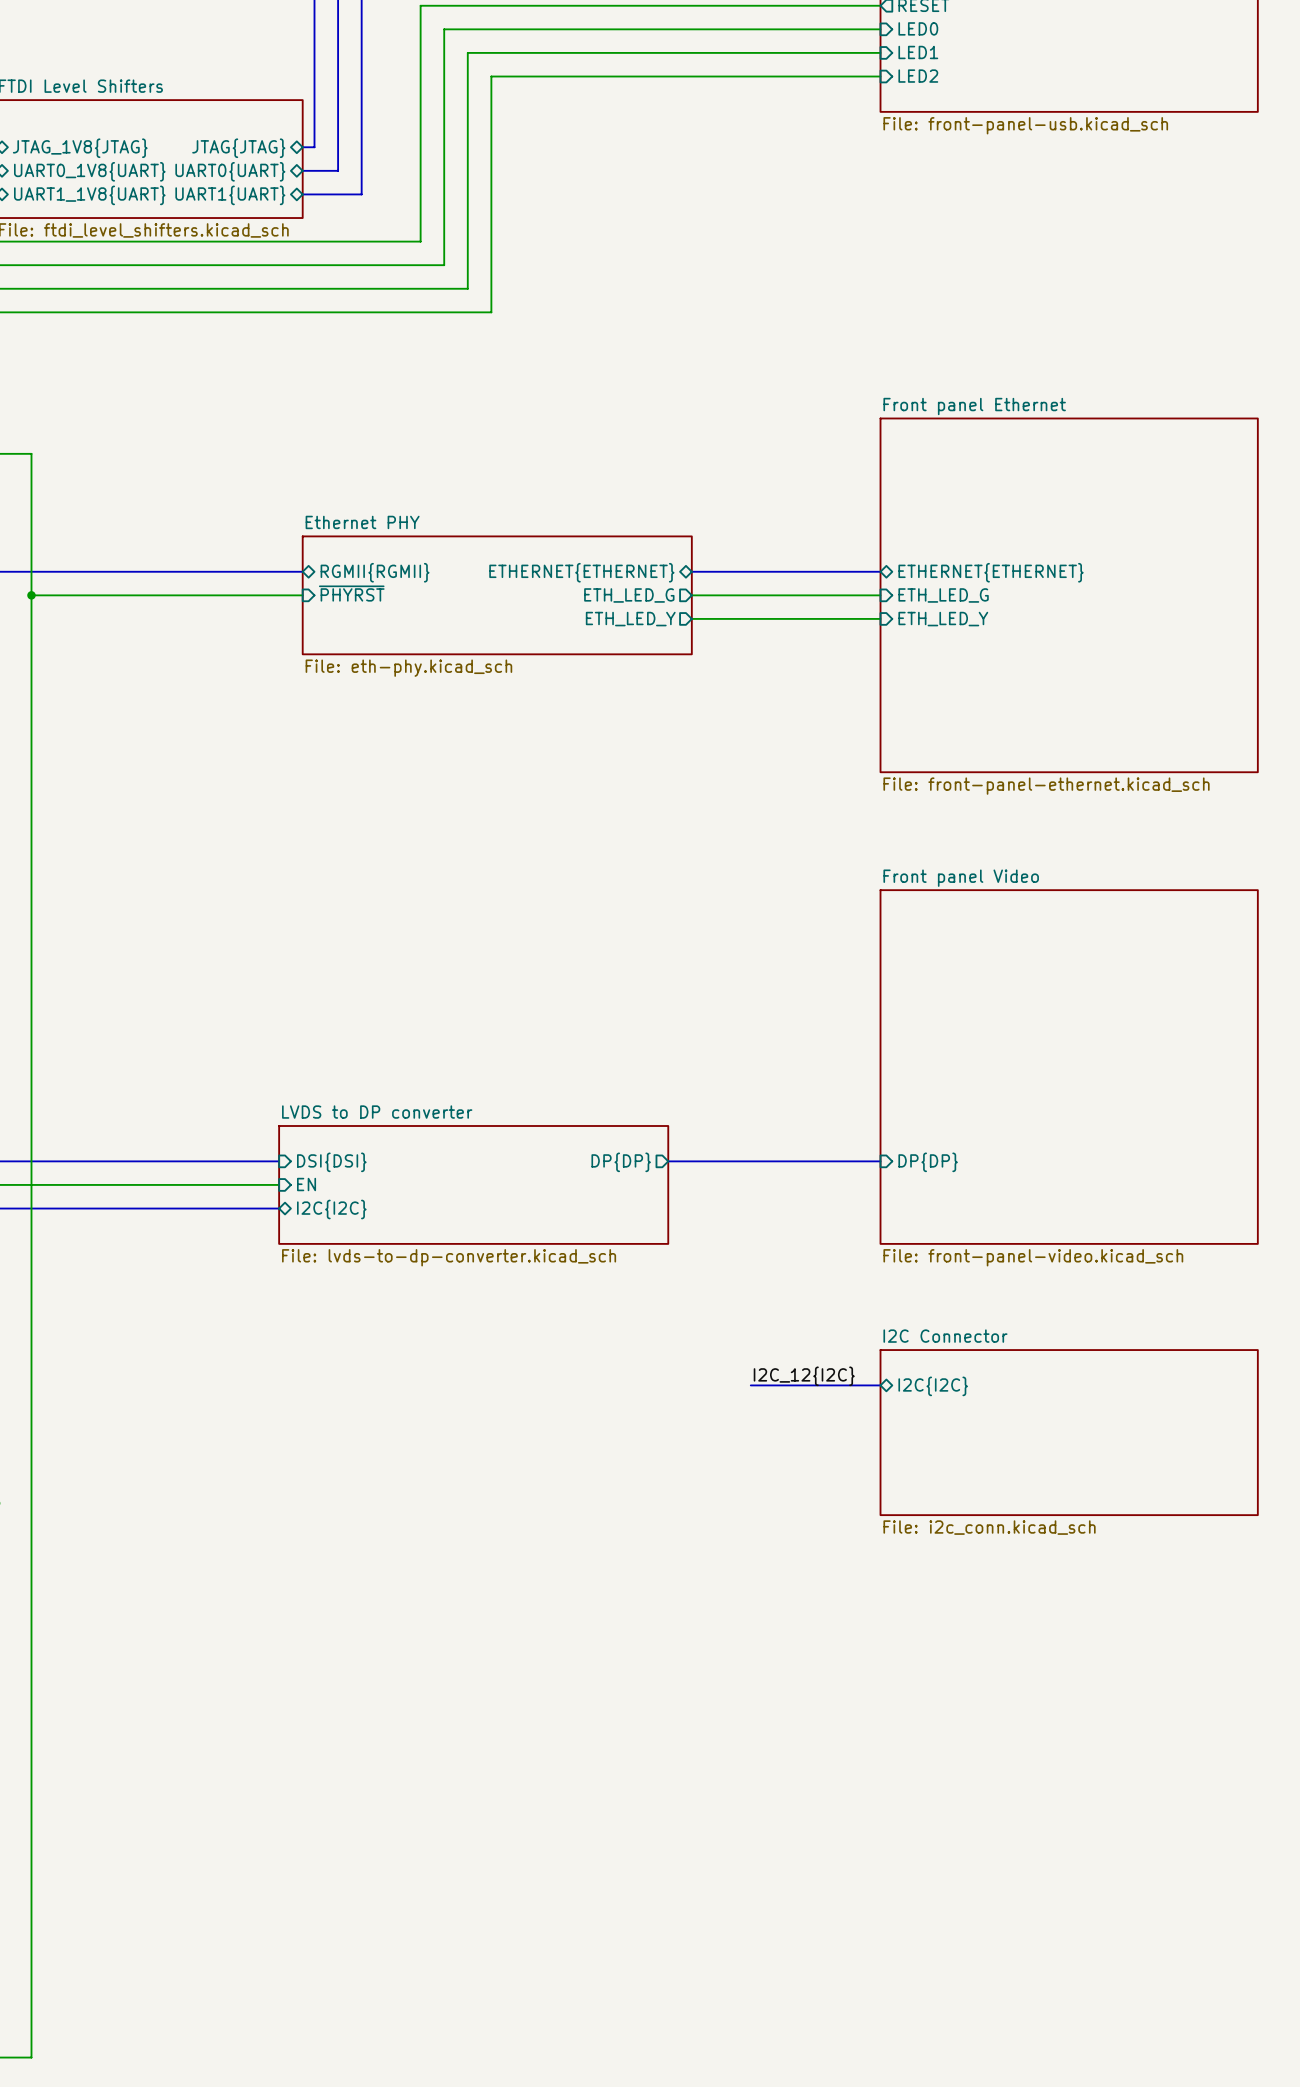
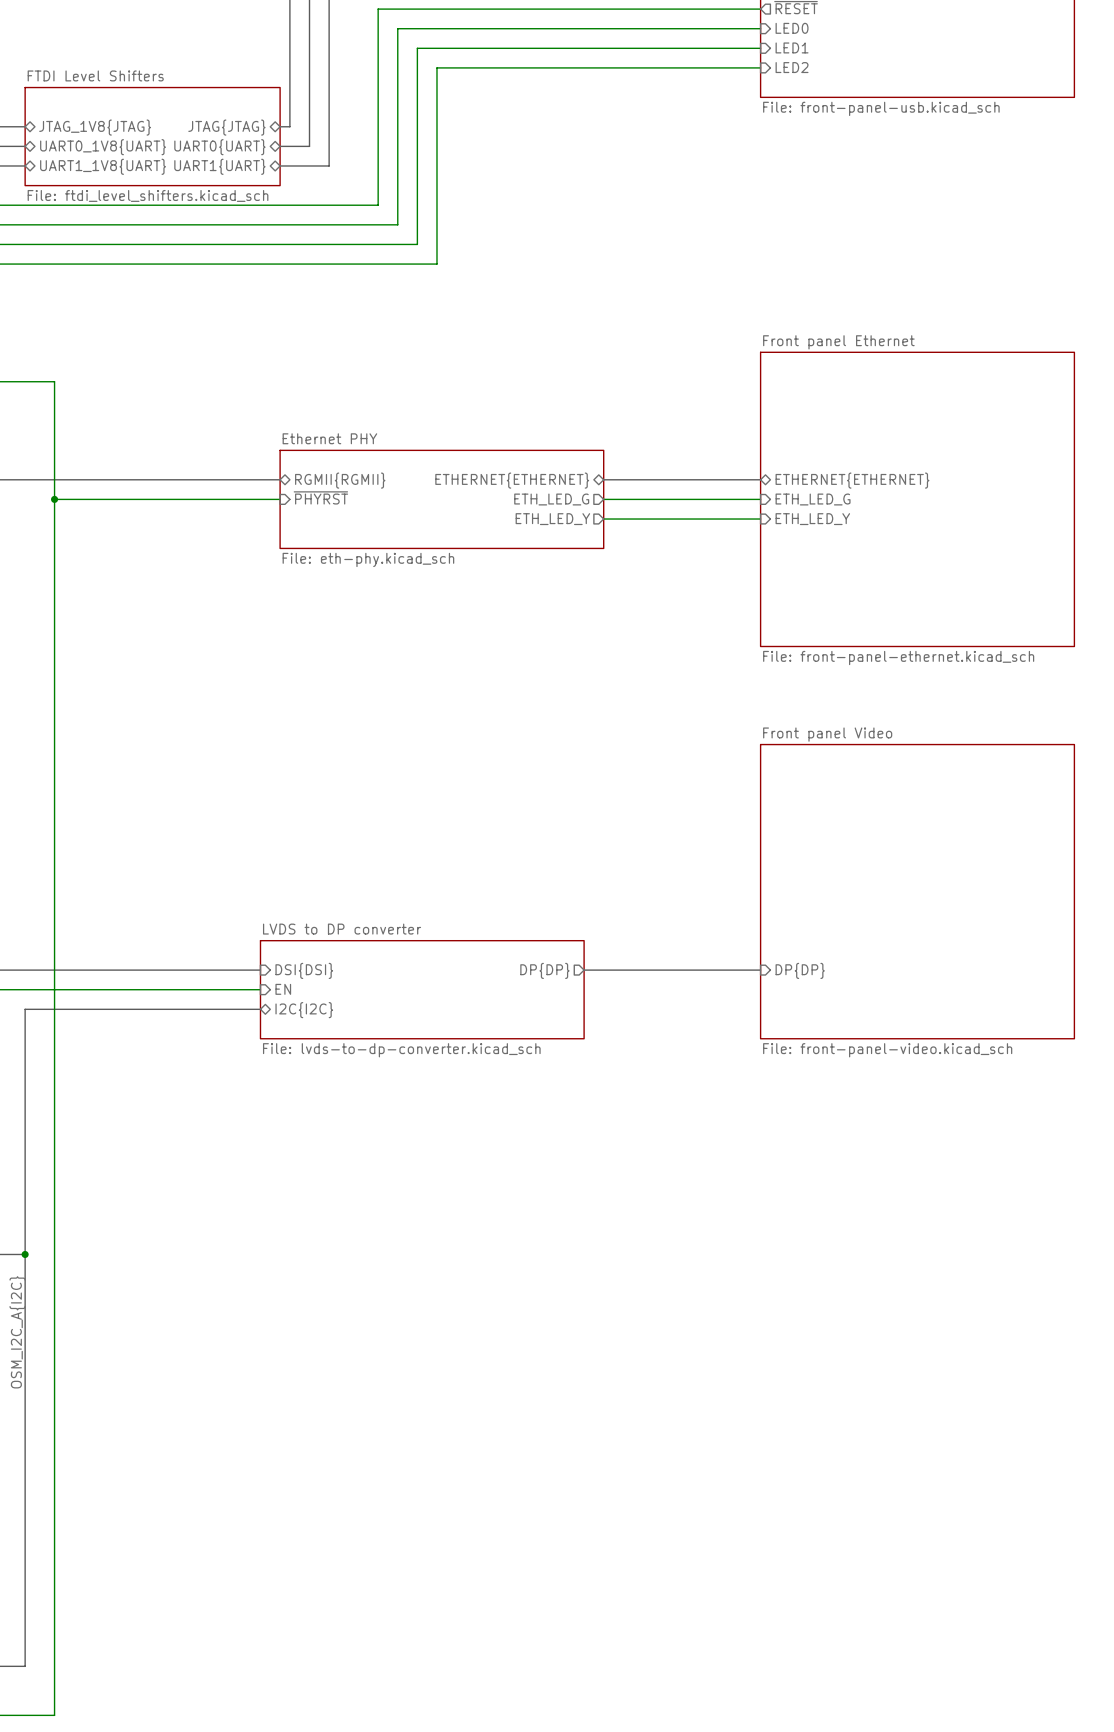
label: I2C_12{I2C} (804, 1376) -> none
bus: (750, 1385) (880, 1385) -> none
sheet pin: I2C{I2C} (933, 1386) -> none
sheet I2C Connector: File: i2c_conn.kicad_sch (1069, 1432) -> none

